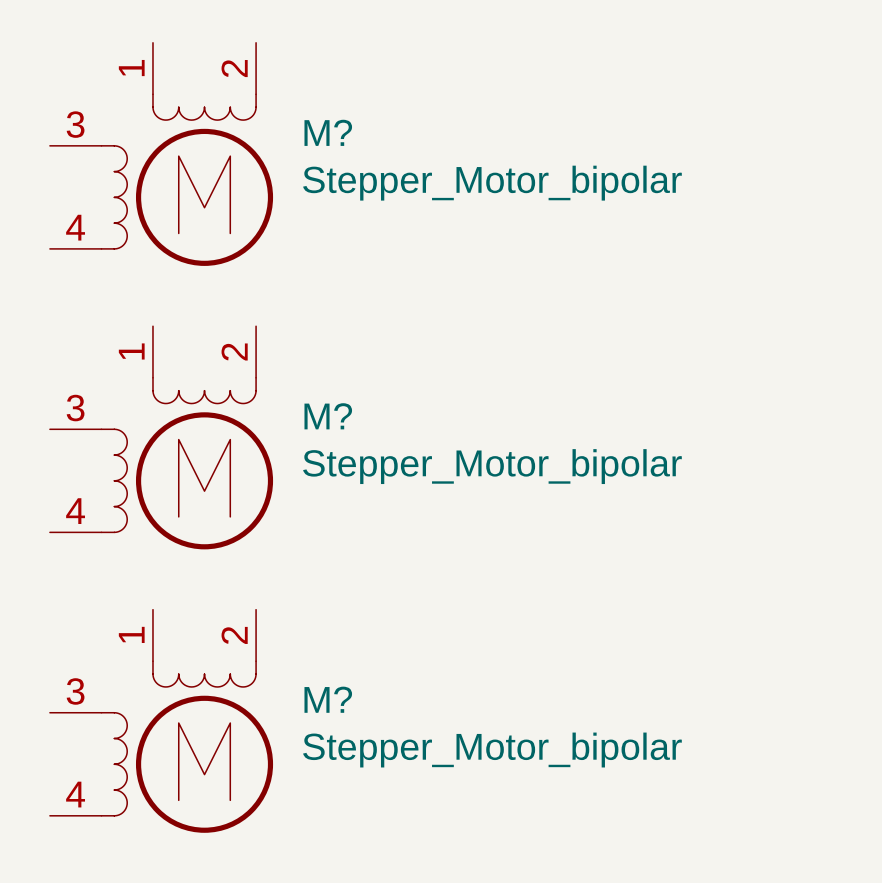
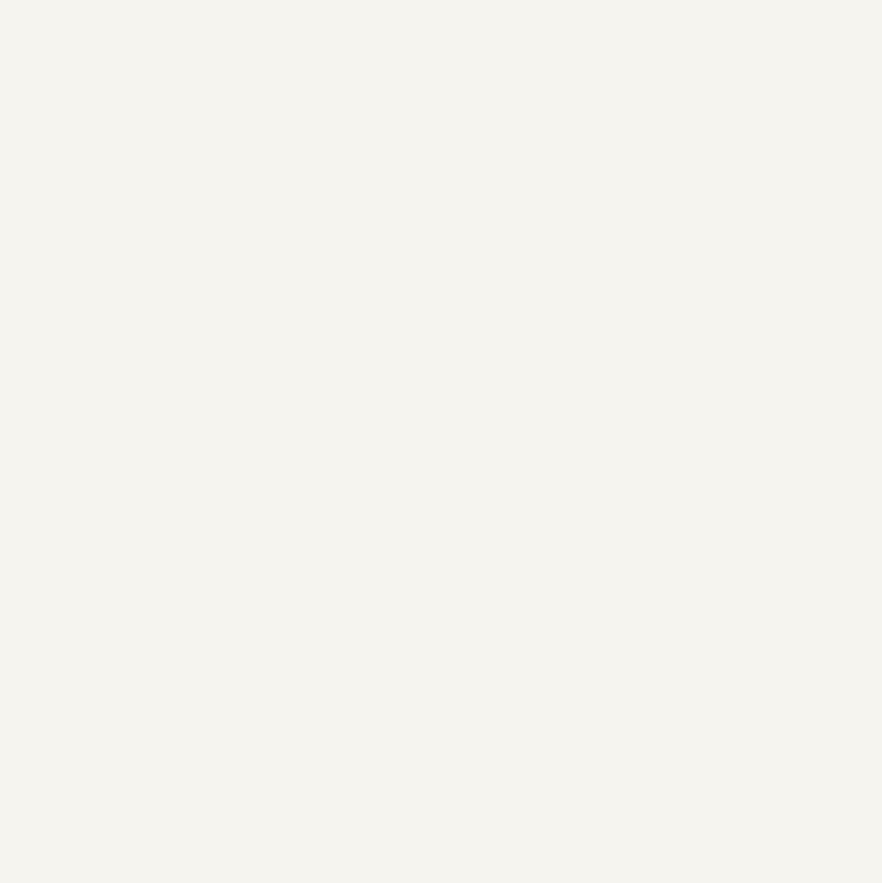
M?: Stepper_Motor_bipolar (161, 154) -> none
M?: Stepper_Motor_bipolar (161, 437) -> none
M?: Stepper_Motor_bipolar (161, 721) -> none

